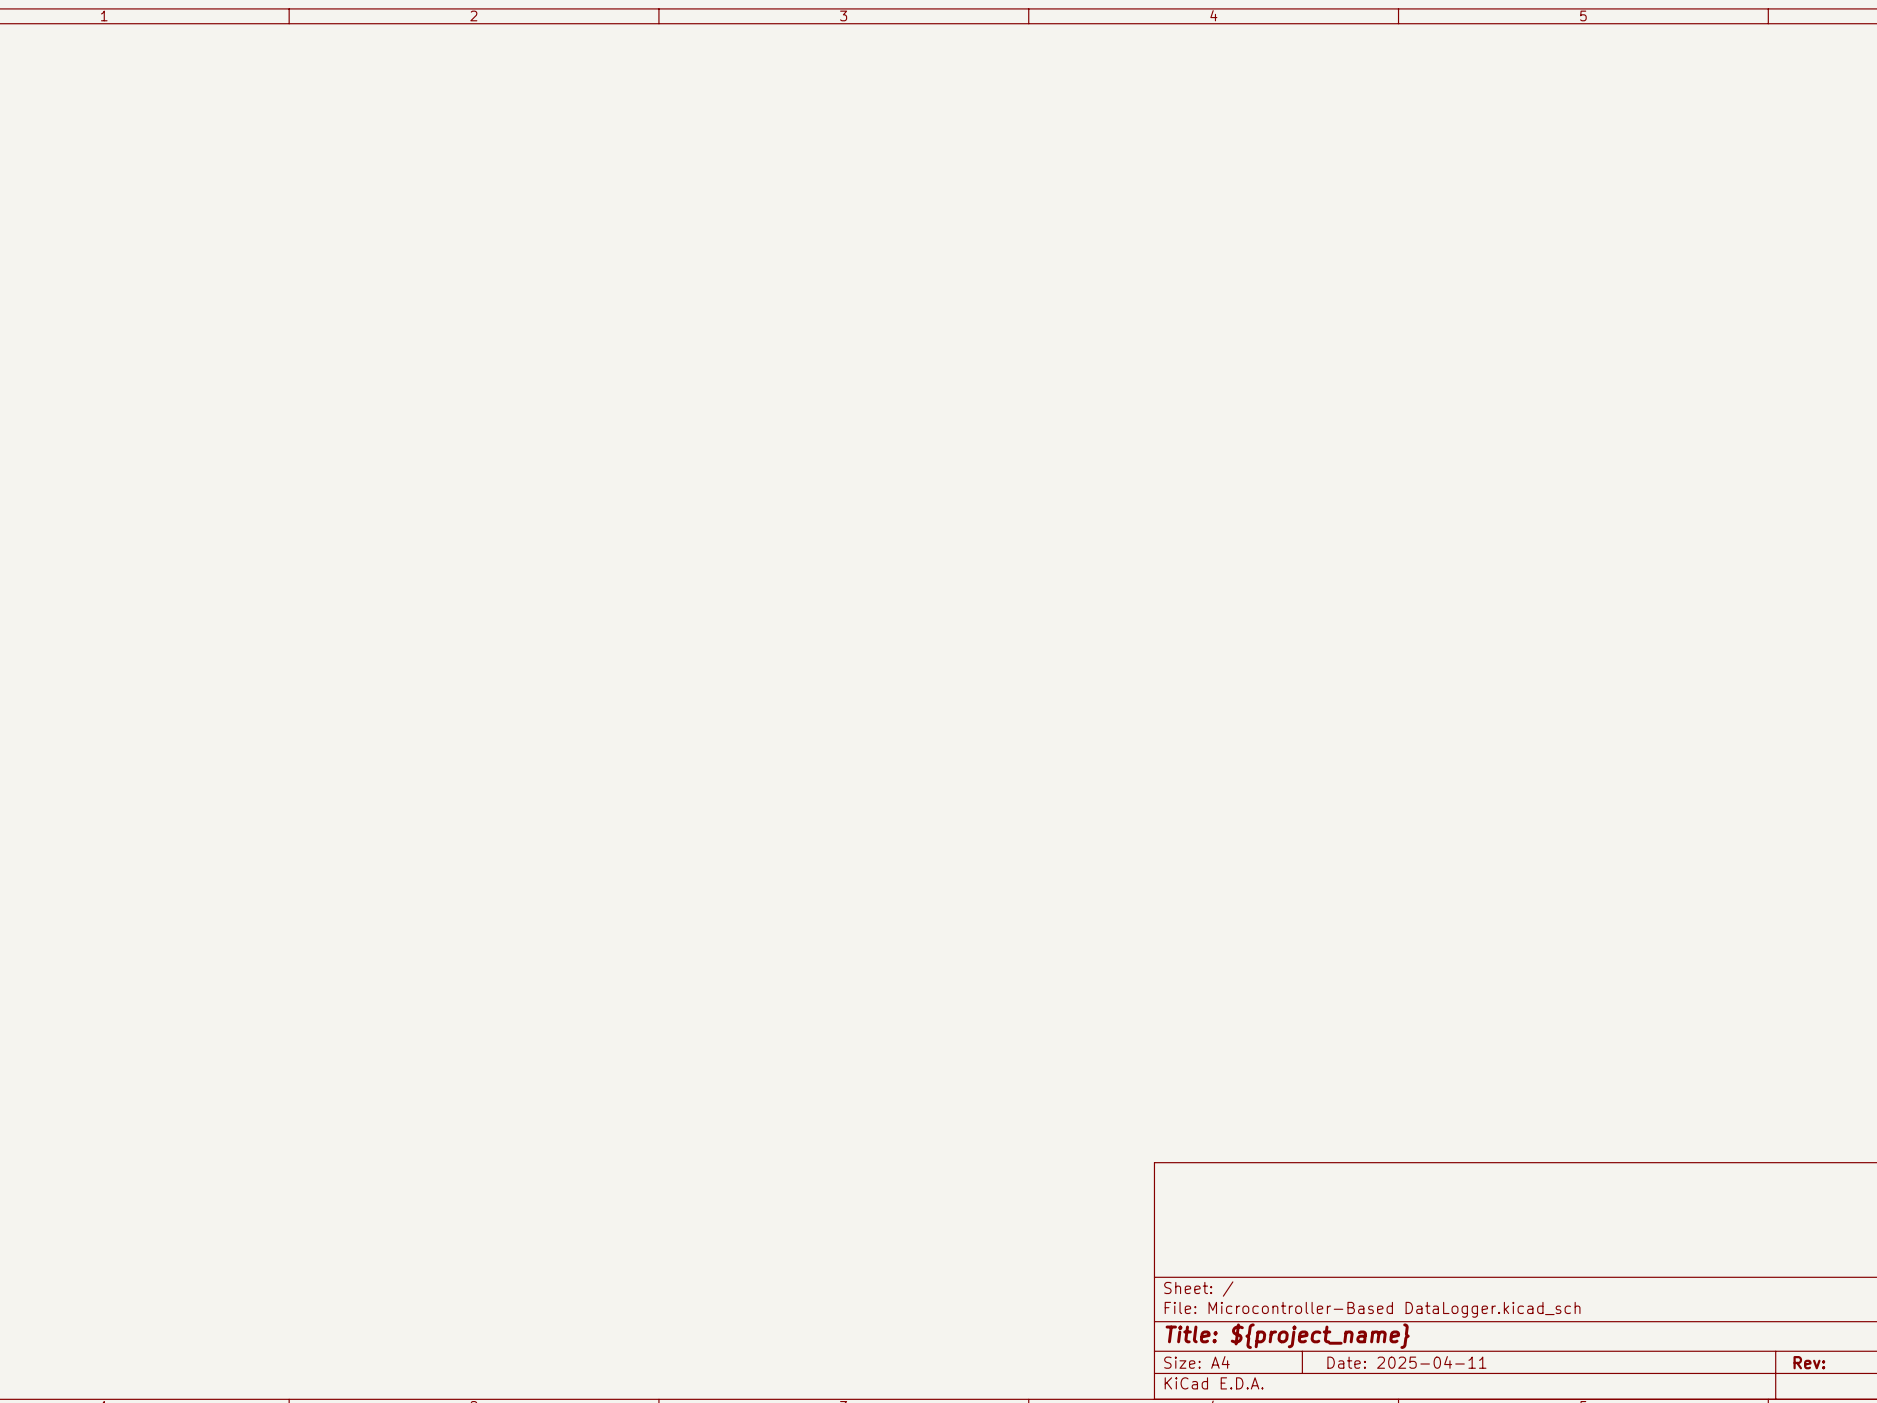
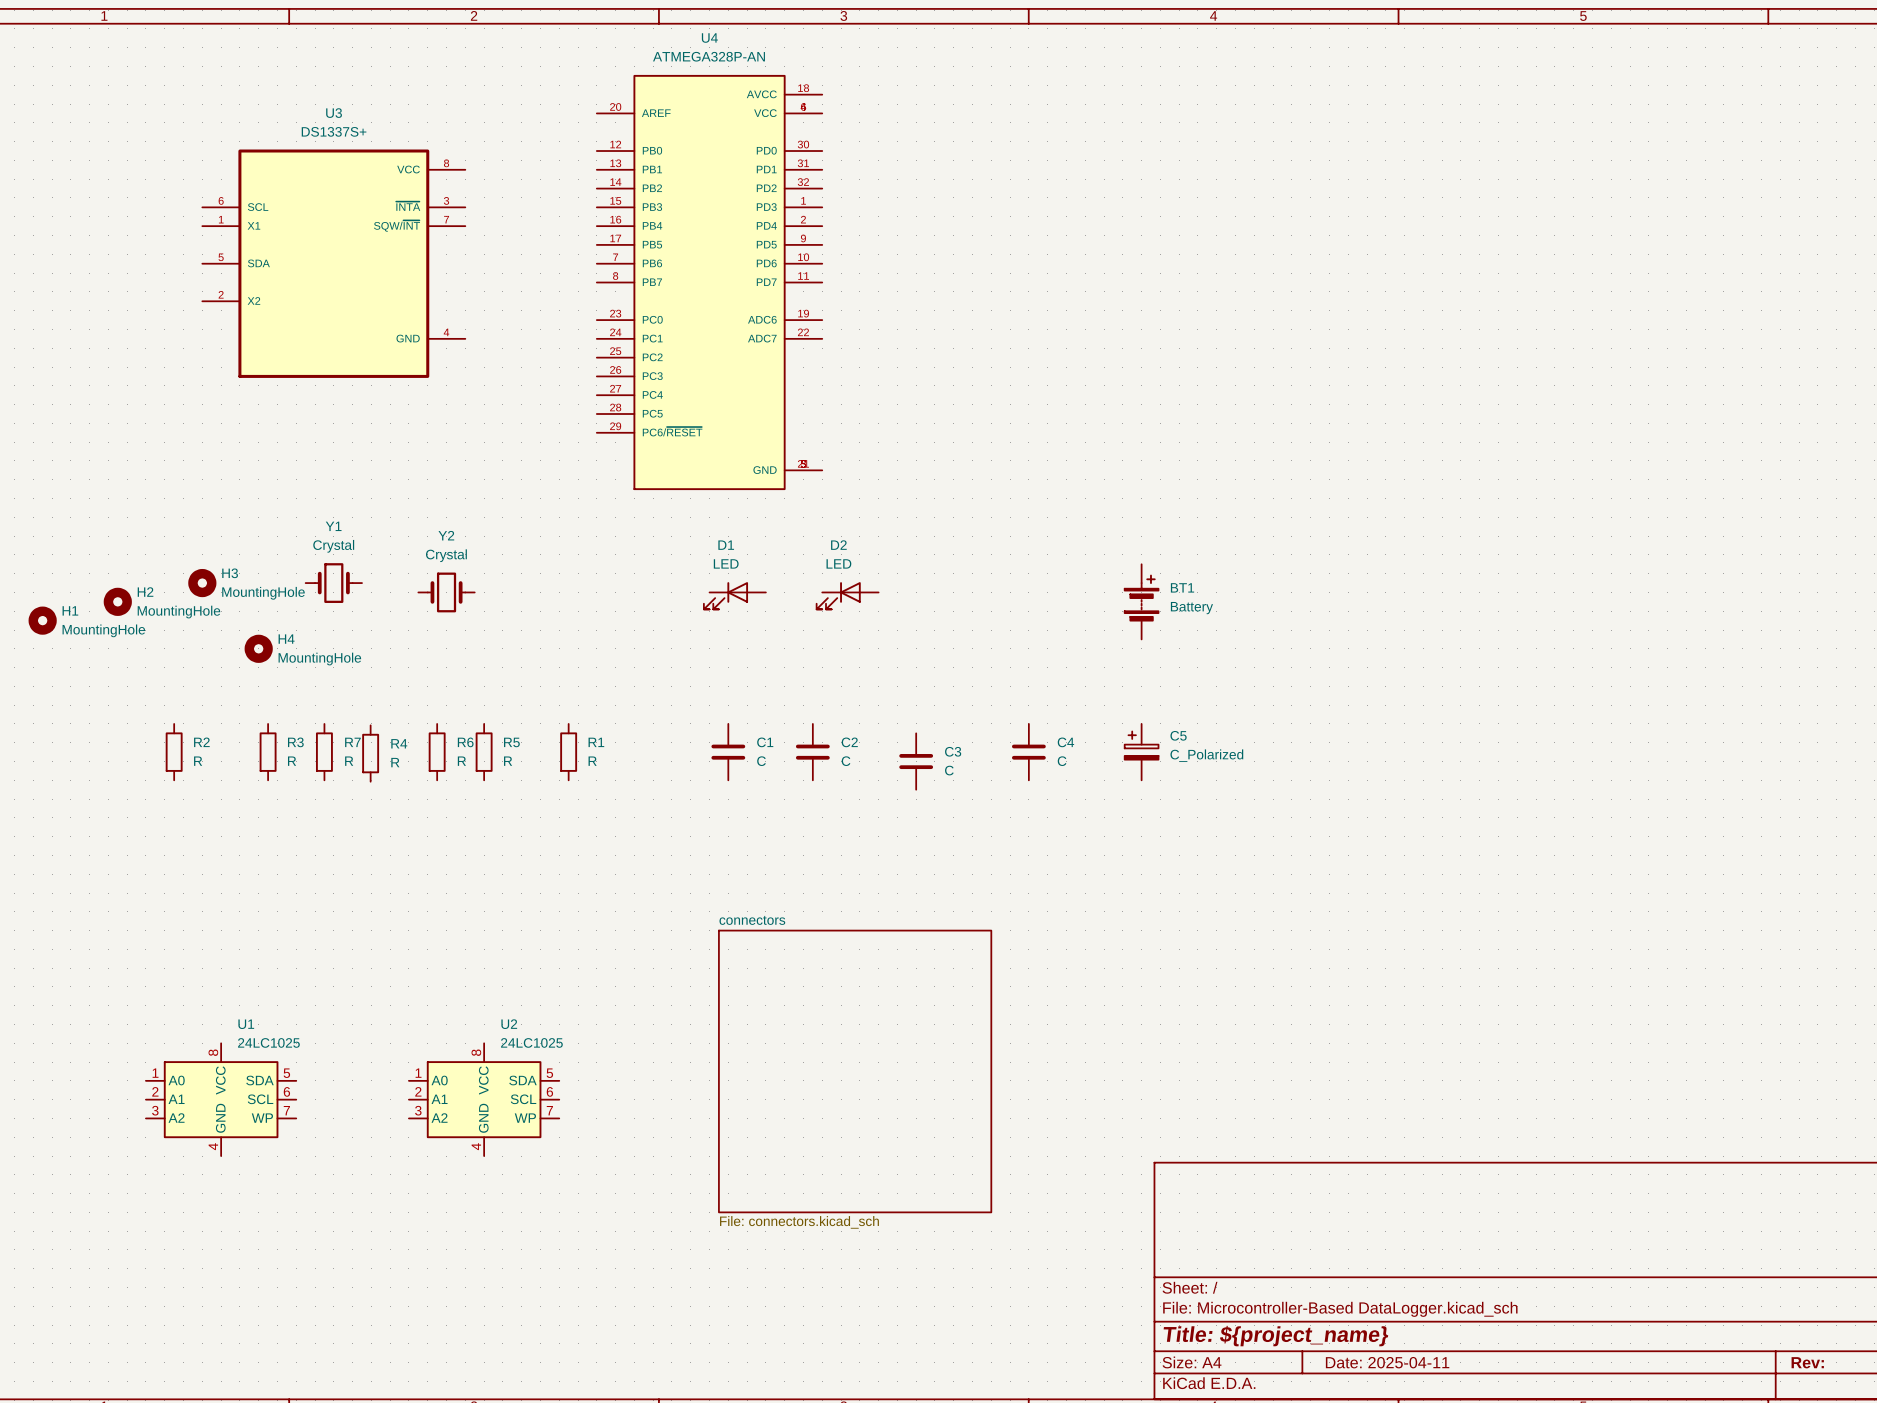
U3: none -> DS1337S+ (333, 263)
U4: none -> ATMEGA328P-AN (709, 282)
H3: none -> MountingHole (202, 583)
Y1: none -> Crystal (333, 583)
Y2: none -> Crystal (446, 592)
D1: none -> LED (734, 595)
D2: none -> LED (847, 595)
H2: none -> MountingHole (117, 601)
BT1: none -> Battery (1141, 601)
H1: none -> MountingHole (42, 620)
H4: none -> MountingHole (258, 648)
R2: none -> R (174, 752)
R3: none -> R (268, 752)
R7: none -> R (324, 752)
R6: none -> R (437, 752)
R5: none -> R (484, 752)
R1: none -> R (568, 752)
C1: none -> C (728, 752)
C2: none -> C (812, 752)
C4: none -> C (1028, 752)
C5: none -> C_Polarized (1141, 752)
R4: none -> R (370, 753)
C3: none -> C (916, 761)
sheet connectors: none -> File: connectors.kicad_sch (855, 1071)
U1: none -> 24LC1025 (221, 1099)
U2: none -> 24LC1025 (484, 1099)

